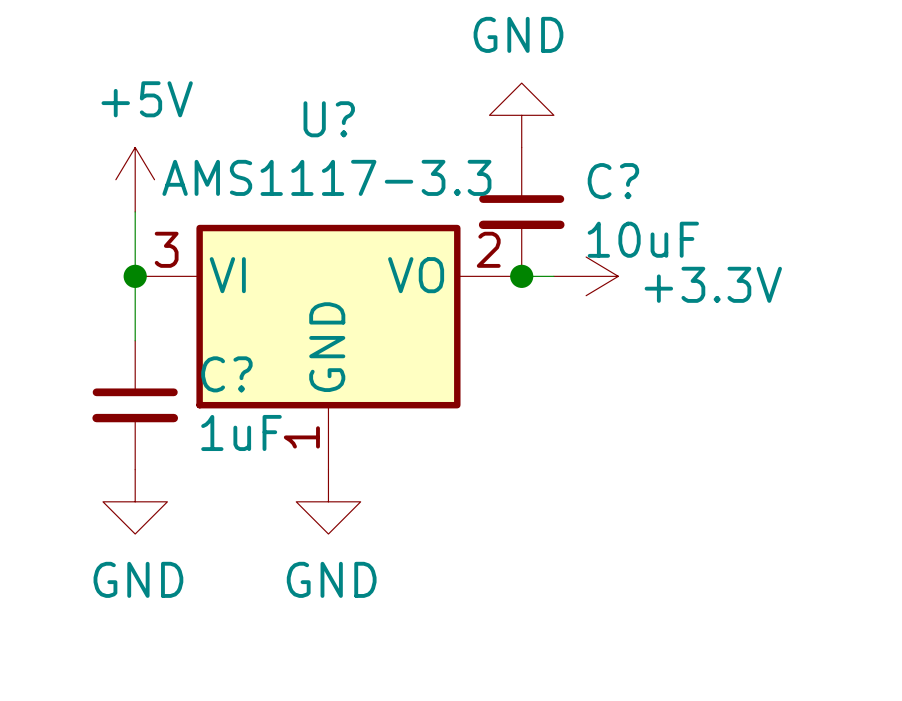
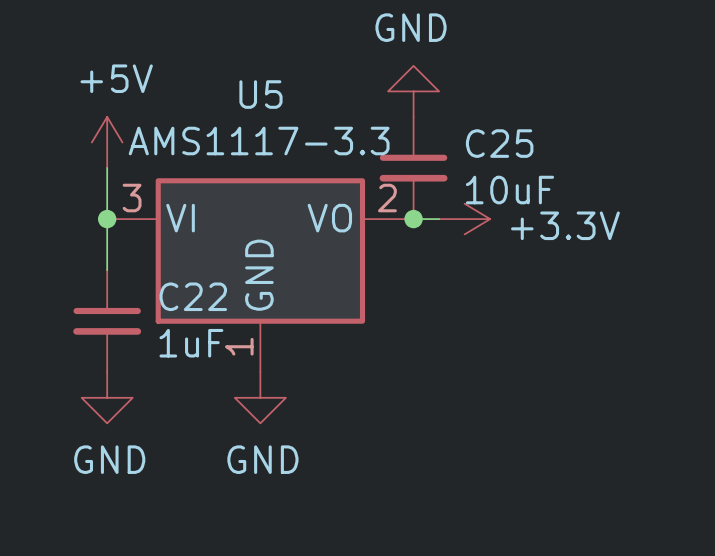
U? name: U? (329, 119) -> U5 (260, 94)
C? name: C? (613, 181) -> C25 (499, 143)
C? name: C? (226, 374) -> C22 (193, 296)

